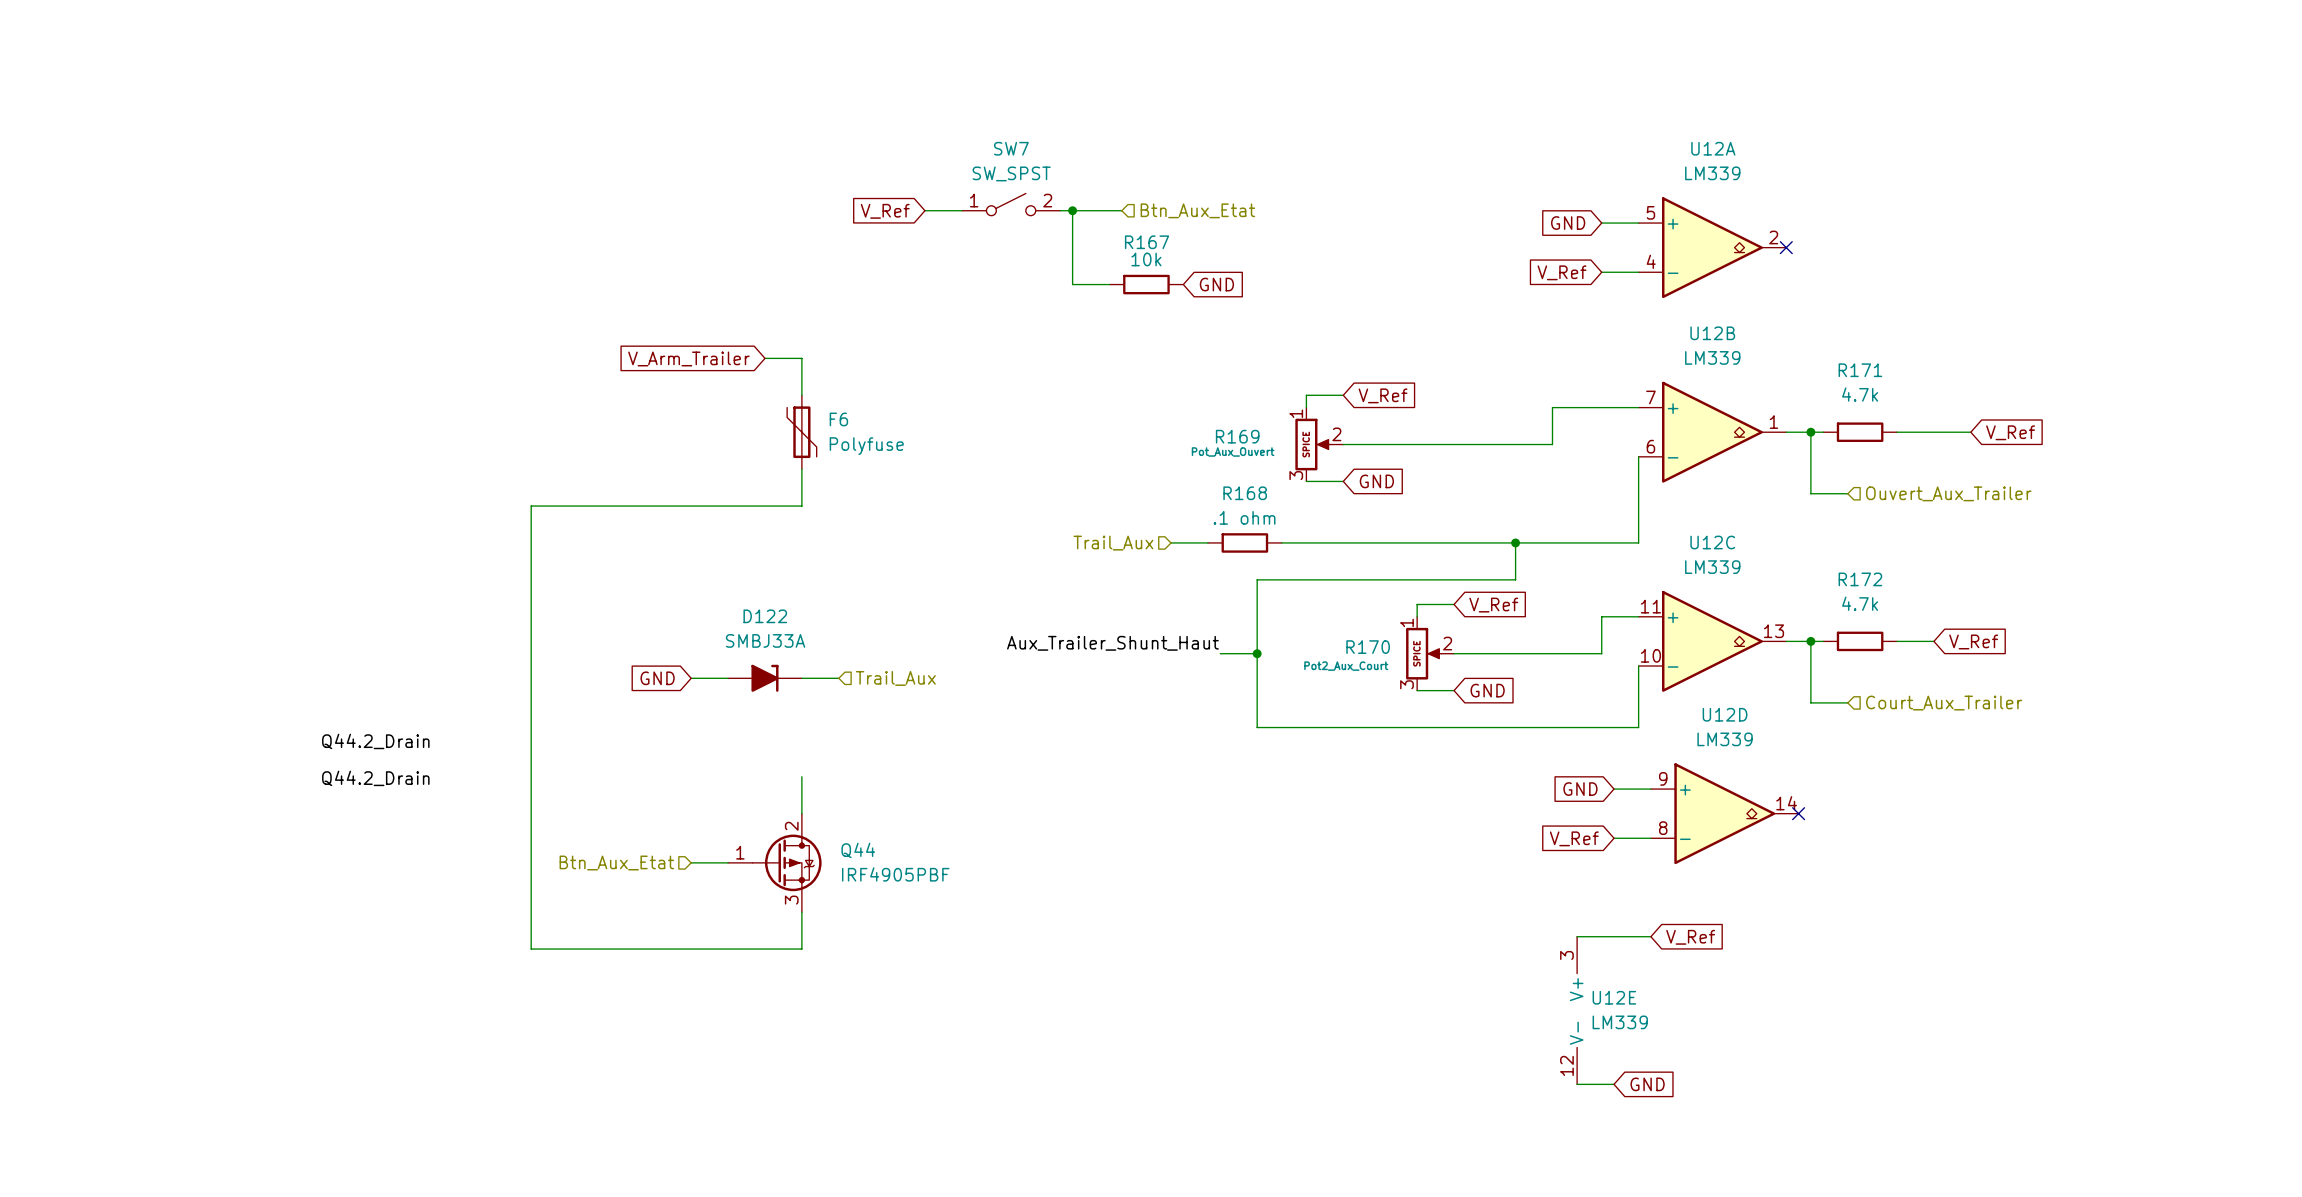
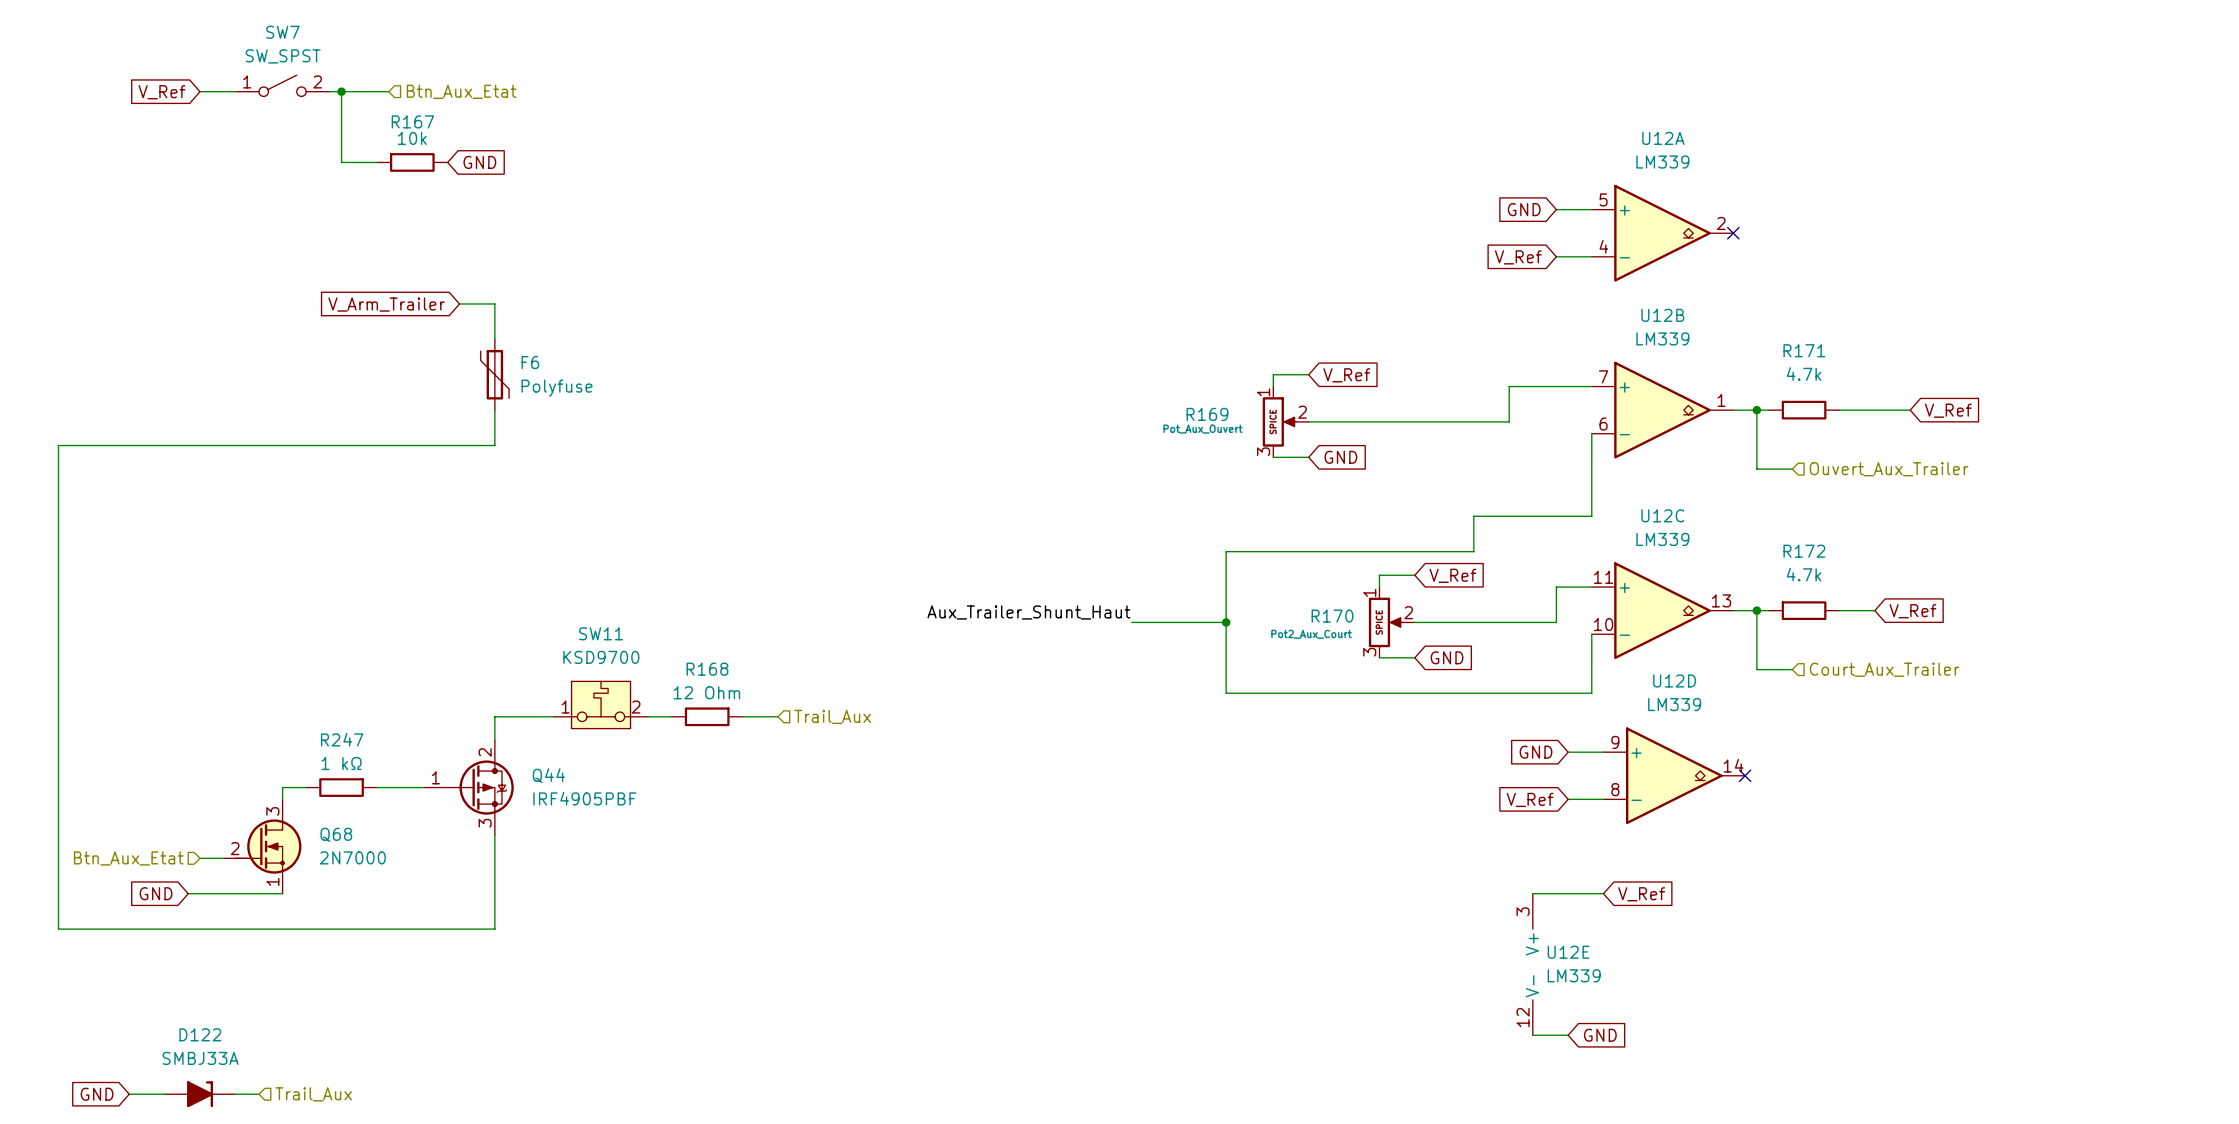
wire: none -> (200, 91) (235, 91)
wire: none -> (329, 91) (388, 91)
wire: none -> (341, 91) (341, 162) (376, 162)
junction: none -> (341, 91)
global label: none -> V_Ref (161, 92)
hierarchical label: none -> Btn_Aux_Etat (461, 91)
global label: none -> GND (479, 162)
SW7 position: (1011, 204) -> (282, 85)
wire: (924, 210) (961, 210) -> none
wire: (1060, 210) (1121, 210) -> none
wire: (1072, 210) (1072, 284) (1109, 284) -> none
junction: (1072, 210) -> none
hierarchical label: Btn_Aux_Etat (1197, 210) -> none
global label: V_Ref (885, 211) -> none
R167 position: (1146, 284) -> (412, 162)
global label: GND (1216, 284) -> none
wire: none -> (459, 303) (494, 303) (494, 339)
global label: none -> V_Arm_Trailer (386, 304)
global label: V_Arm_Trailer (688, 358) -> none
wire: (764, 358) (801, 358) (801, 395) -> none
wire: none -> (494, 410) (494, 445) (58, 445) (58, 929) (494, 929) (494, 834)
F6 position: (801, 432) -> (494, 374)
wire: (801, 469) (801, 506) (531, 506) (531, 949) (801, 949) (801, 912) -> none
R168 value: .1 ohm (1244, 517) -> 12 Ohm (706, 692)
wire: (1171, 542) (1207, 542) -> none
R168 position: (1244, 542) -> (707, 716)
wire: (1281, 542) (1515, 542) -> none
junction: (1515, 542) -> none
hierarchical label: Trail_Aux (1113, 543) -> none
label position: Aux_Trailer_Shunt_Haut (1112, 643) -> Aux_Trailer_Shunt_Haut (1028, 612)
wire: none -> (1131, 622) (1190, 622)
global label: GND (657, 678) -> none
wire: (691, 678) (728, 678) -> none
D122 position: (764, 678) -> (200, 1094)
wire: (801, 678) (838, 678) -> (742, 716) (777, 716)
hierarchical label position: Trail_Aux (895, 678) -> Trail_Aux (832, 716)
SW11: none -> KSD9700 (601, 705)
label: Q44.2_Drain (375, 741) -> none
wire: none -> (553, 716) (494, 716) (494, 740)
wire: none -> (648, 716) (671, 716)
wire: (801, 776) (801, 813) -> none
label: Q44.2_Drain (375, 778) -> none
wire: none -> (306, 787) (282, 787) (282, 799)
R247: none -> 1 kΩ (341, 787)
wire: none -> (376, 787) (424, 787)
wire: (691, 862) (728, 862) -> none
Q44 position: (774, 862) -> (468, 787)
hierarchical label: Btn_Aux_Etat (616, 863) -> none
Q68: none -> 2N7000 (262, 846)
hierarchical label: none -> Btn_Aux_Etat (128, 858)
wire: none -> (200, 858) (223, 858)
global label: none -> GND (156, 893)
wire: none -> (188, 893) (282, 893)
global label: none -> GND (97, 1094)
wire: none -> (129, 1094) (164, 1094)
wire: none -> (235, 1094) (258, 1094)
hierarchical label: none -> Trail_Aux (313, 1094)

